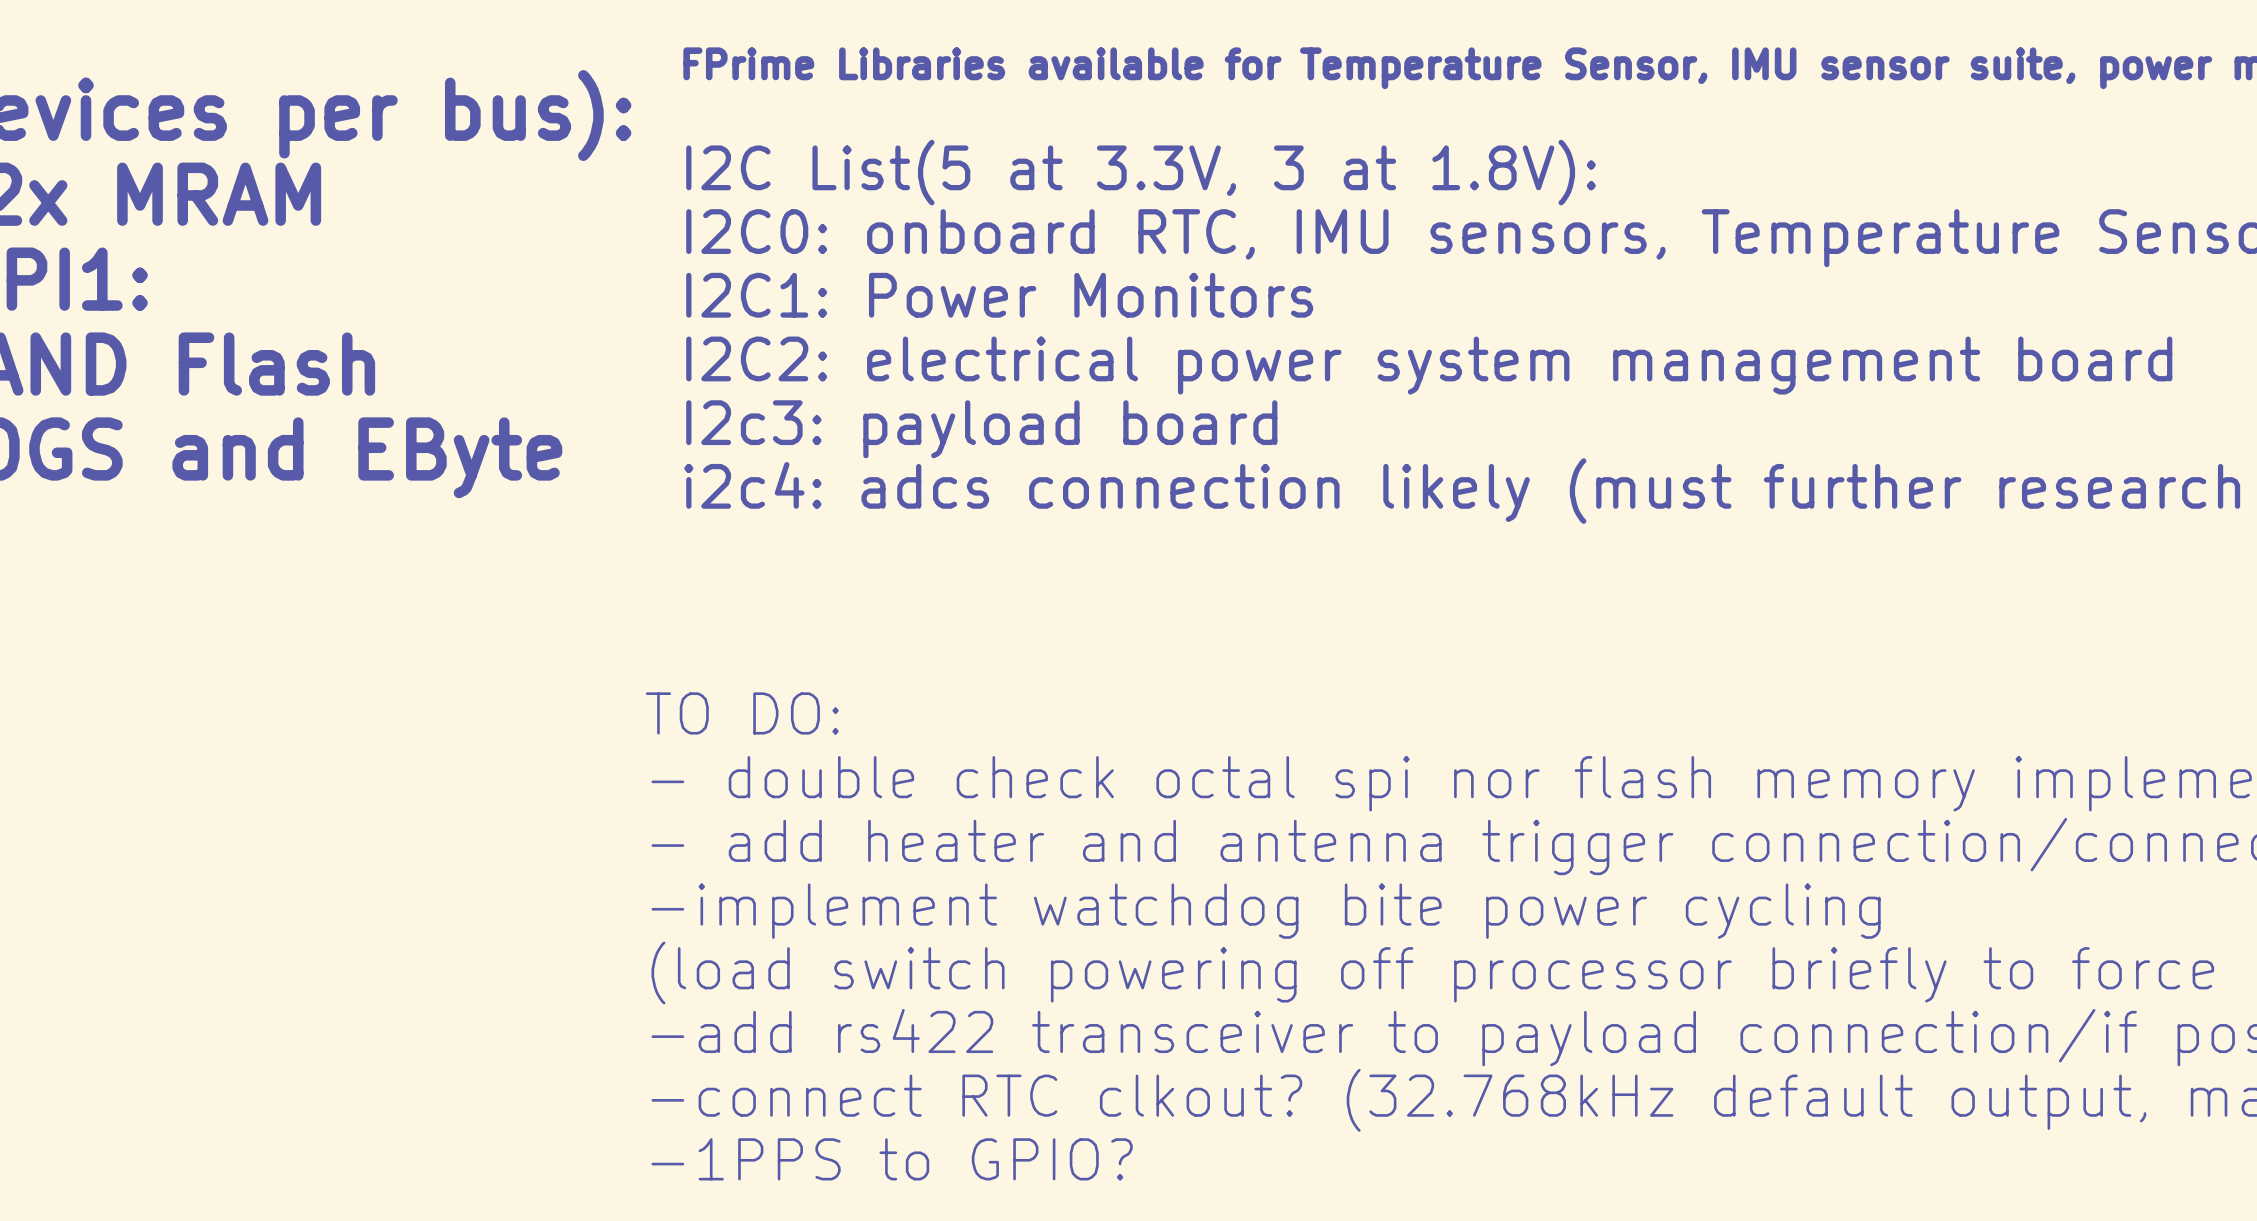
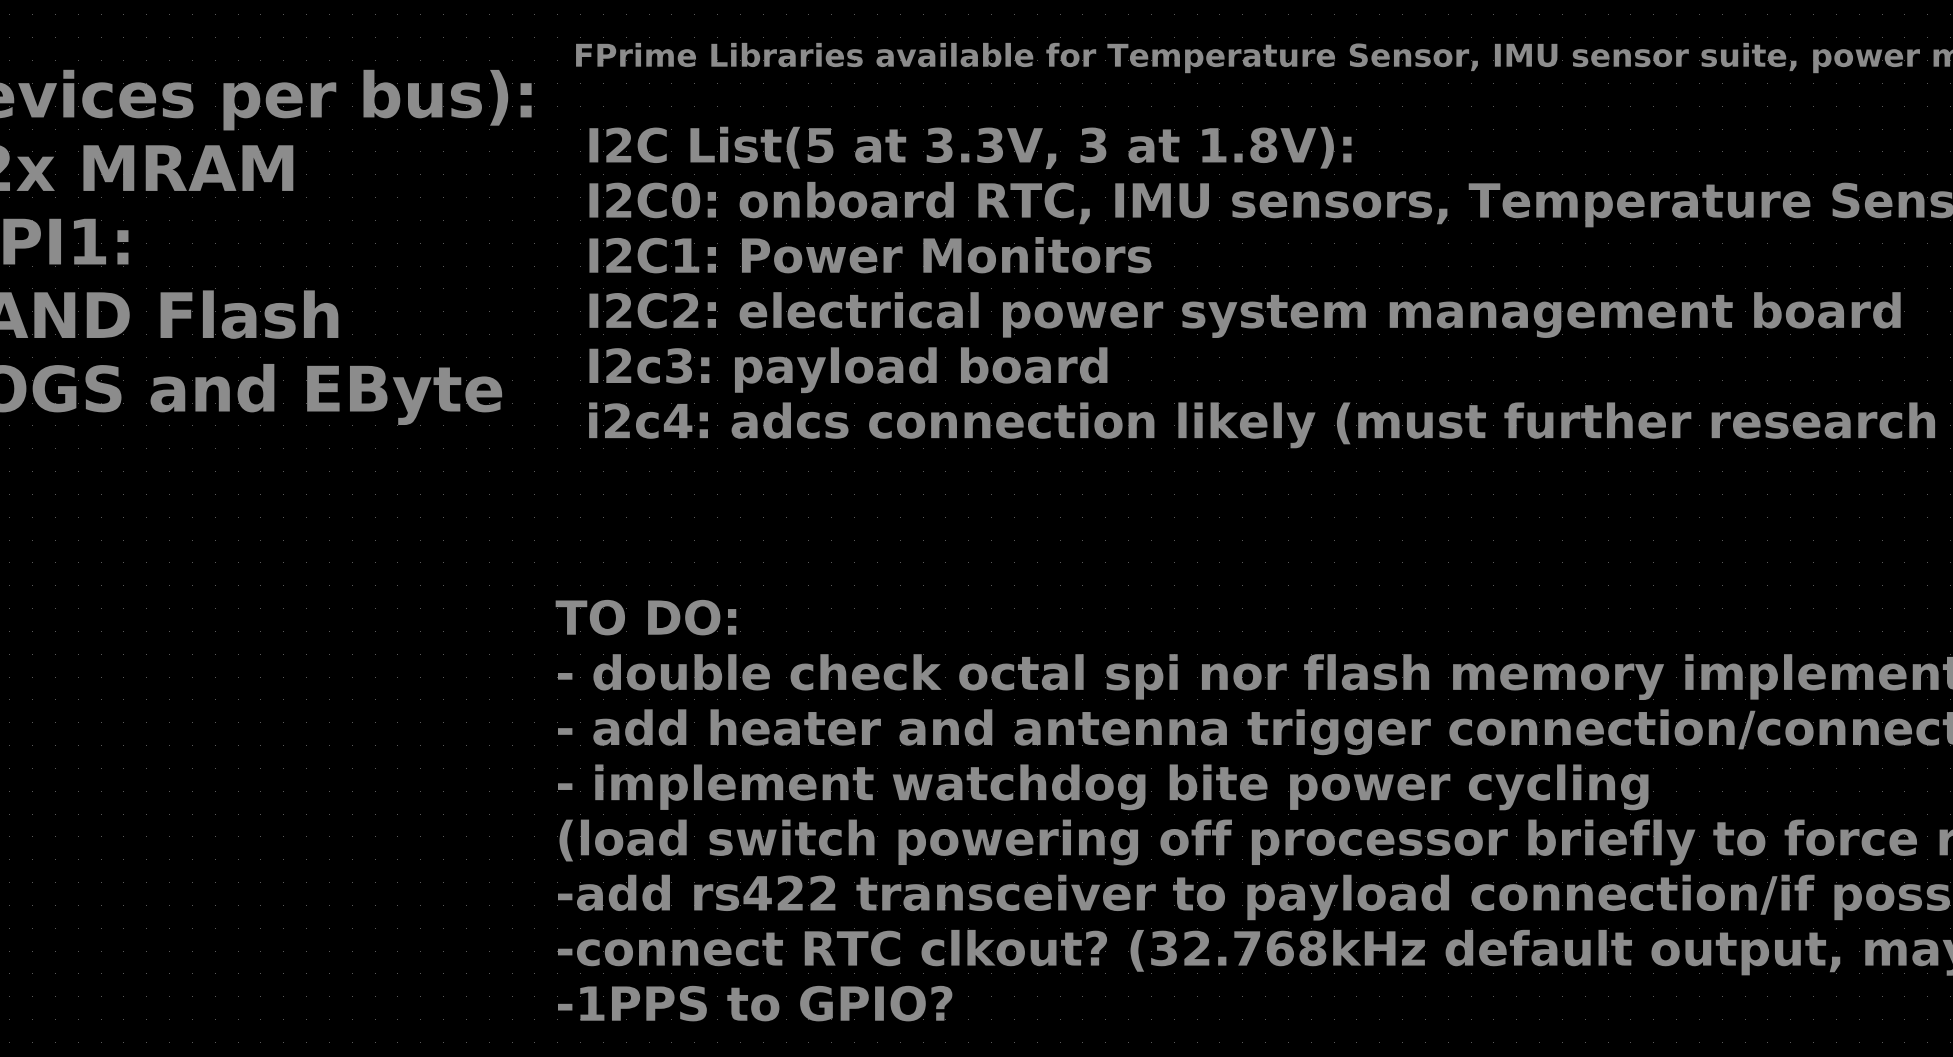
text: -implement watchdog bite power cycling (1266, 911) -> - implement watchdog bite power cycling (1103, 787)

